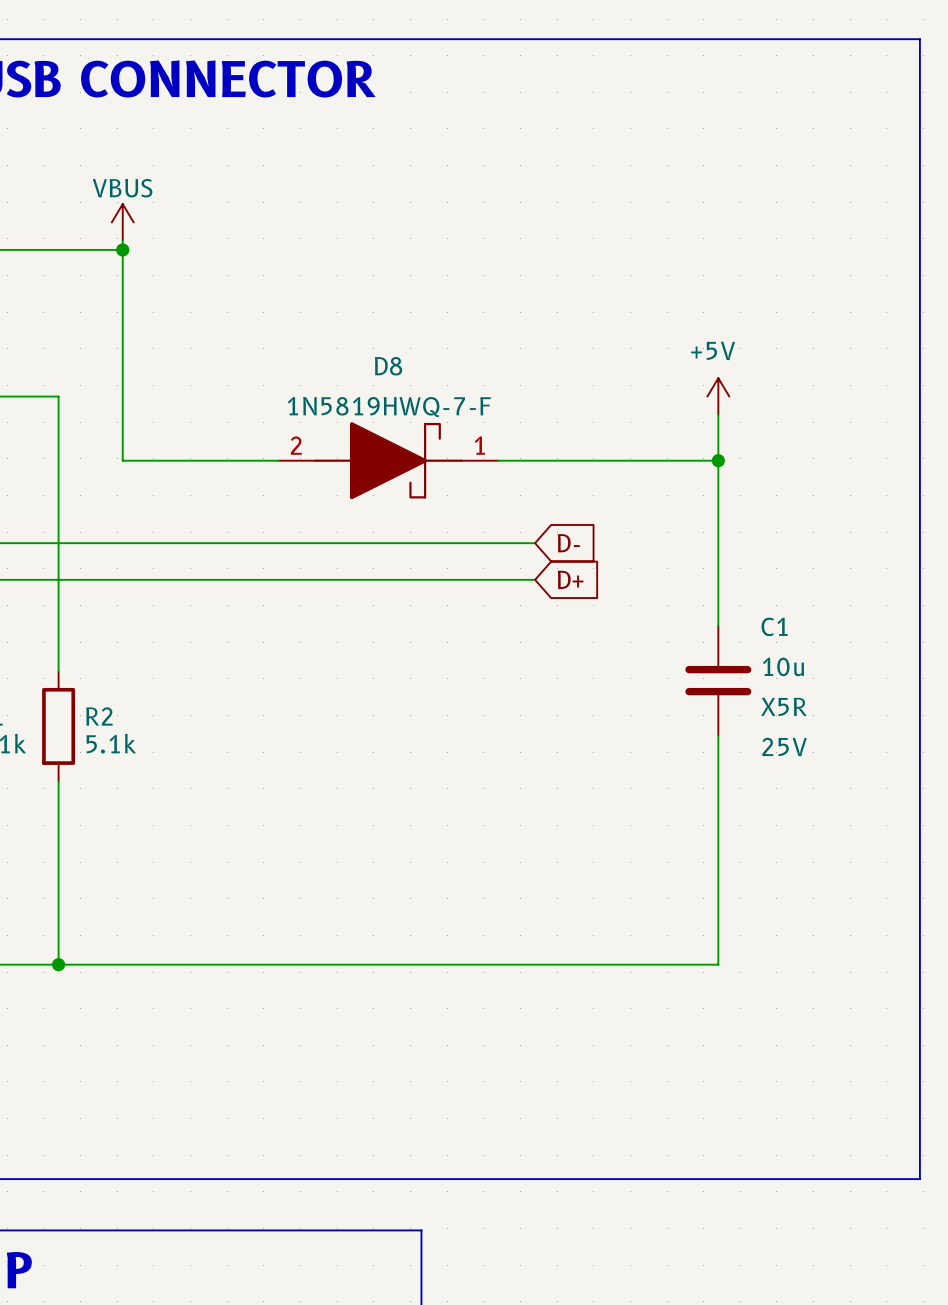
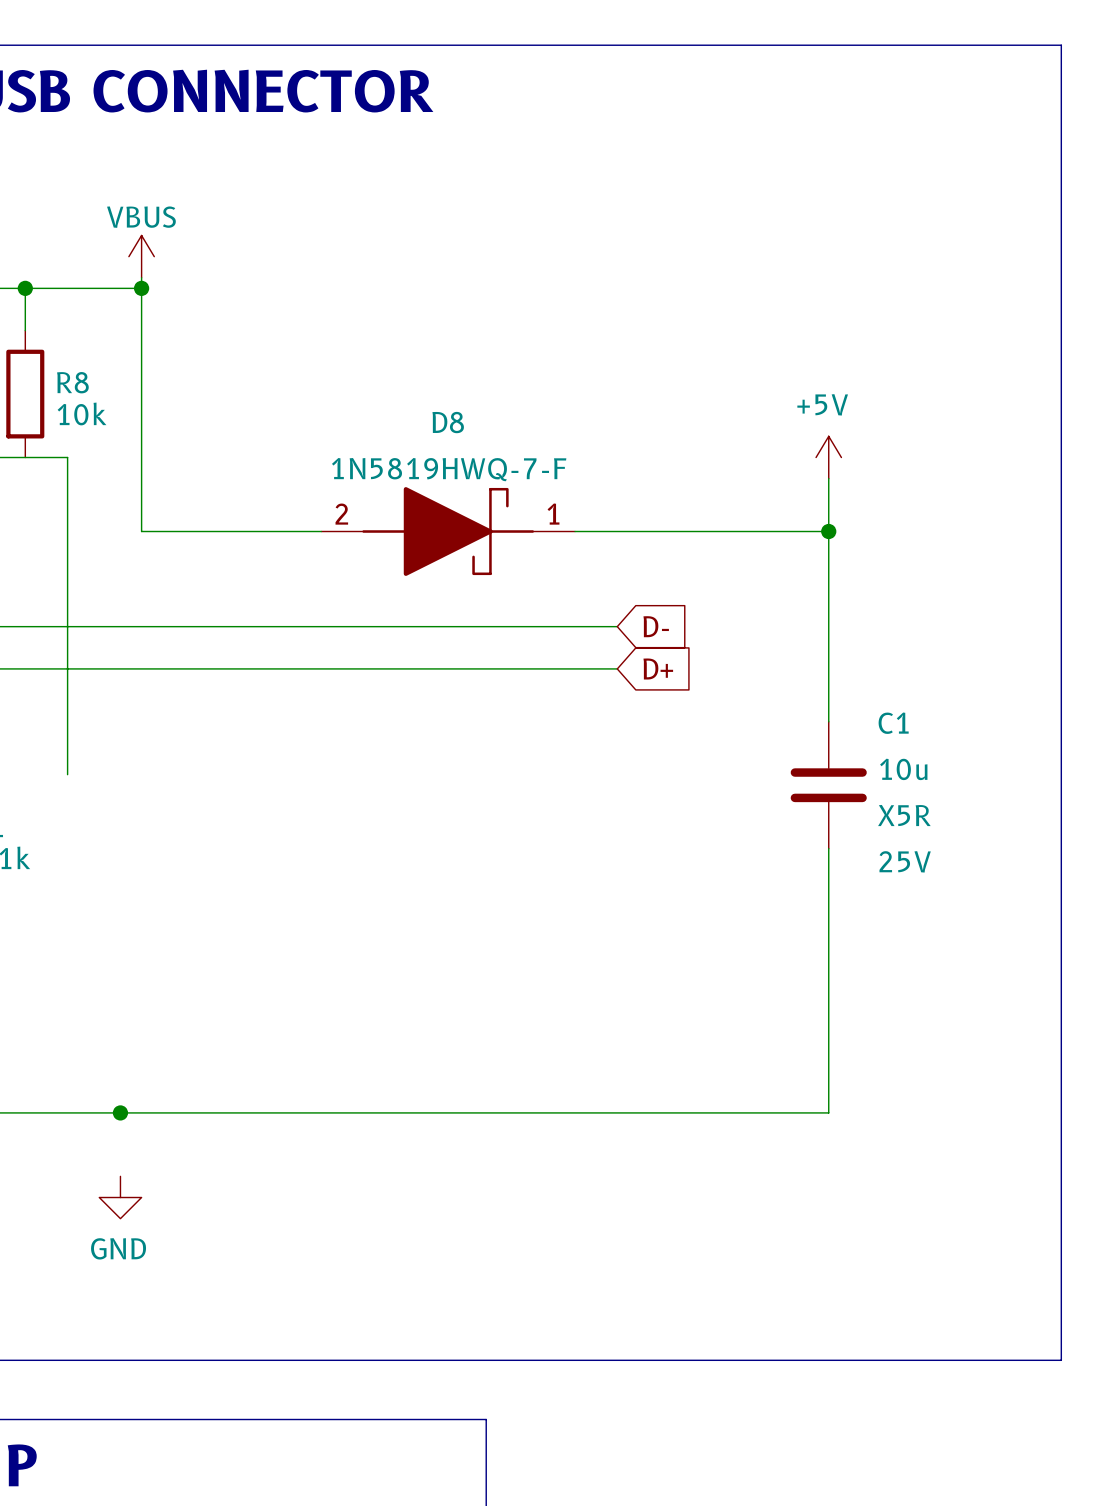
wire: none -> (25, 288) (25, 330)
junction: none -> (25, 288)
R8: none -> 10k (25, 394)
R2: 5.1k (58, 726) -> none
wire: (58, 781) (58, 964) -> none
junction position: (58, 964) -> (120, 1112)
power symbol: none -> GND (120, 1197)

